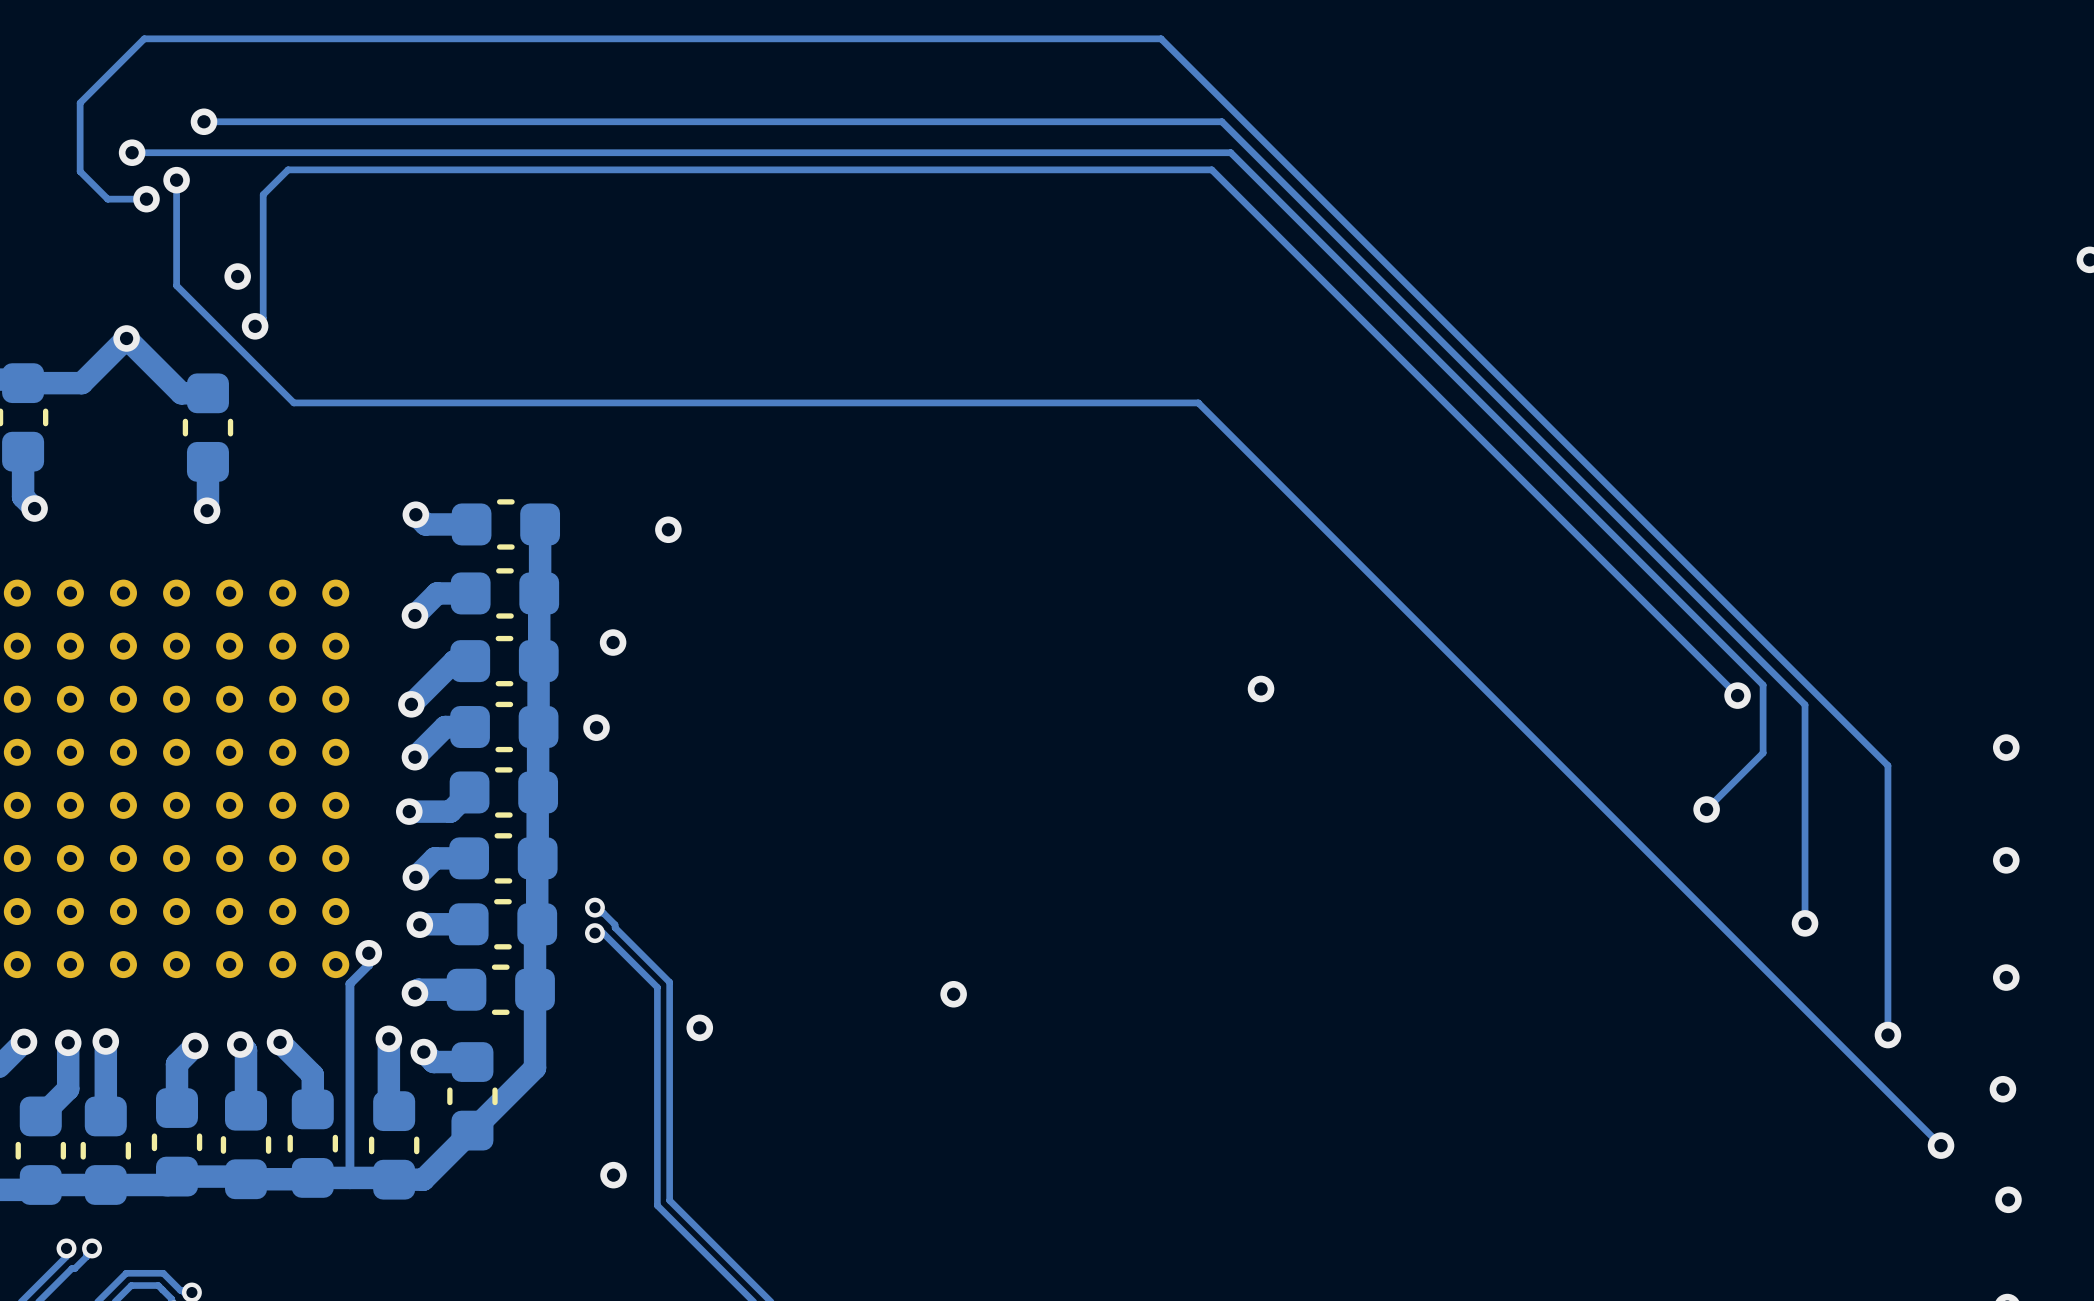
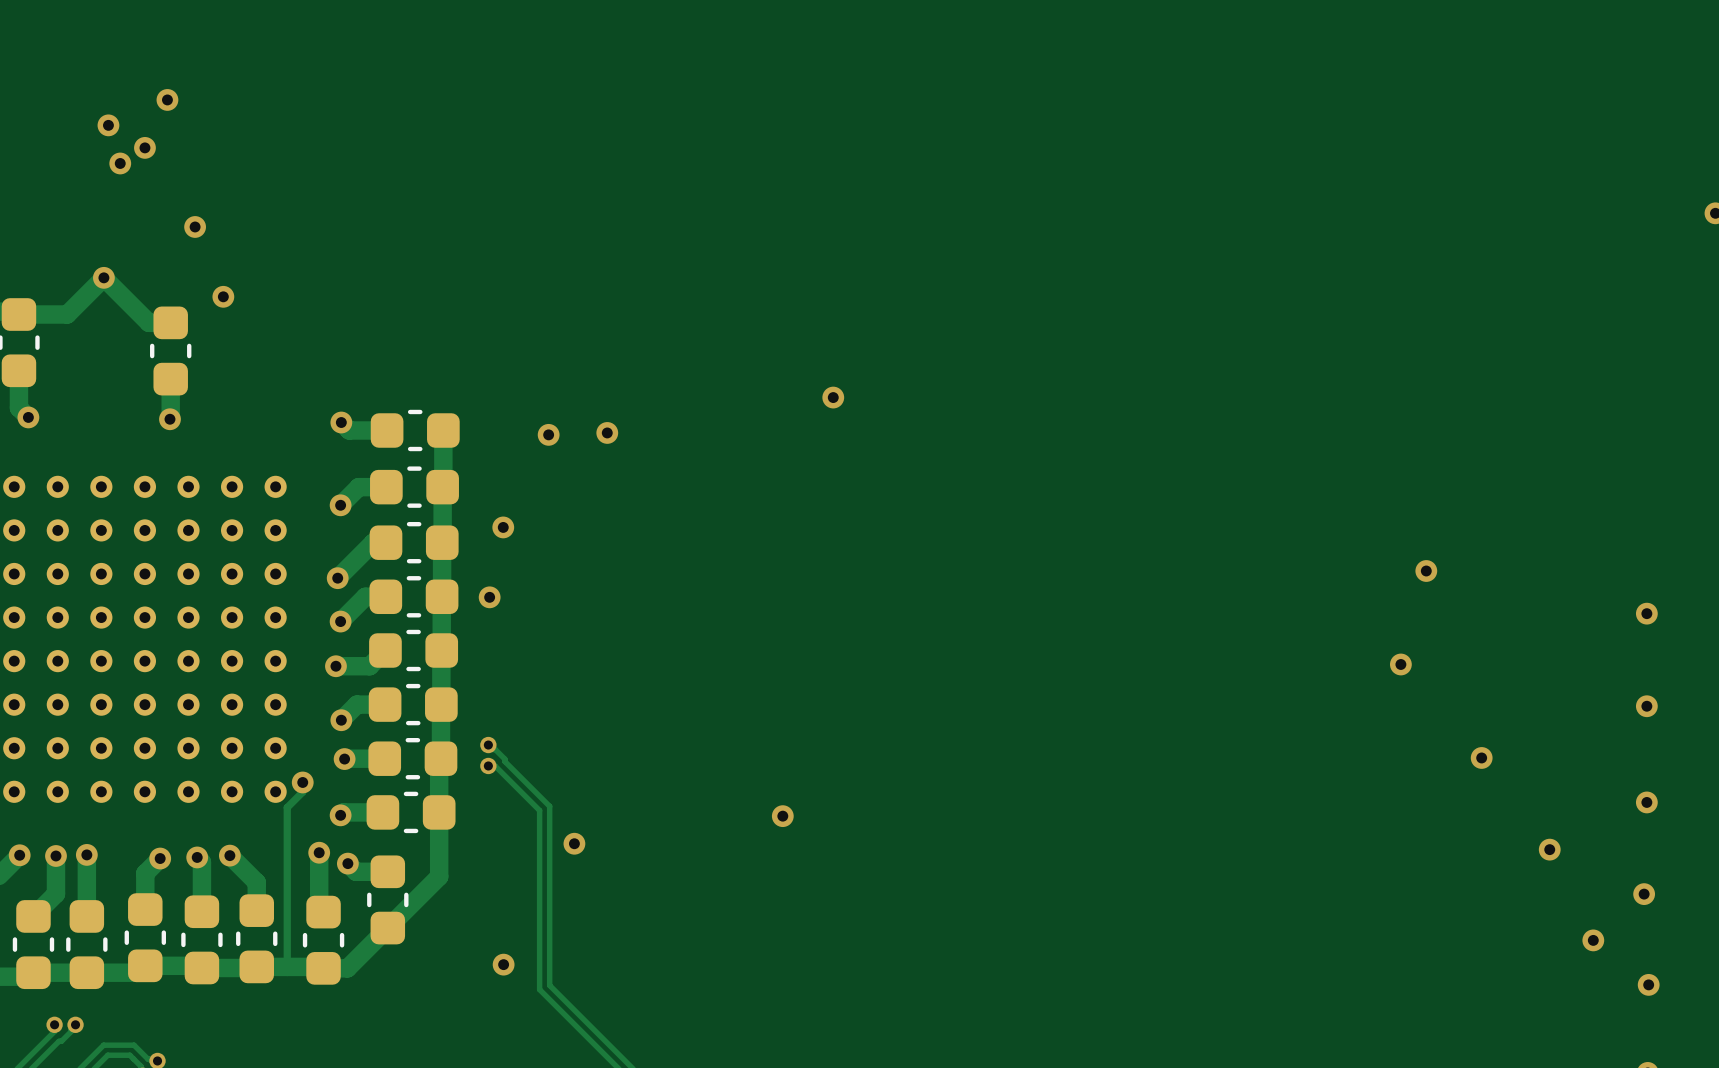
track: (203, 121) (1221, 121) (1805, 704) (1805, 923) -> none
track: (132, 152) (1230, 152) (1763, 685) (1763, 753) (1706, 809) -> none
track: (176, 180) (176, 285) (293, 402) (1198, 402) (1941, 1145) -> none
track: (146, 199) (107, 199) (80, 171) (80, 102) (144, 38) (1161, 38) (1887, 765) (1887, 1035) -> none
track: (255, 326) (263, 318) (263, 194) (288, 169) (1211, 169) (1737, 695) -> none
via position: (255, 326) -> (223, 296)
via: none -> (833, 397)
via: none -> (607, 432)
via: (1261, 688) -> none

